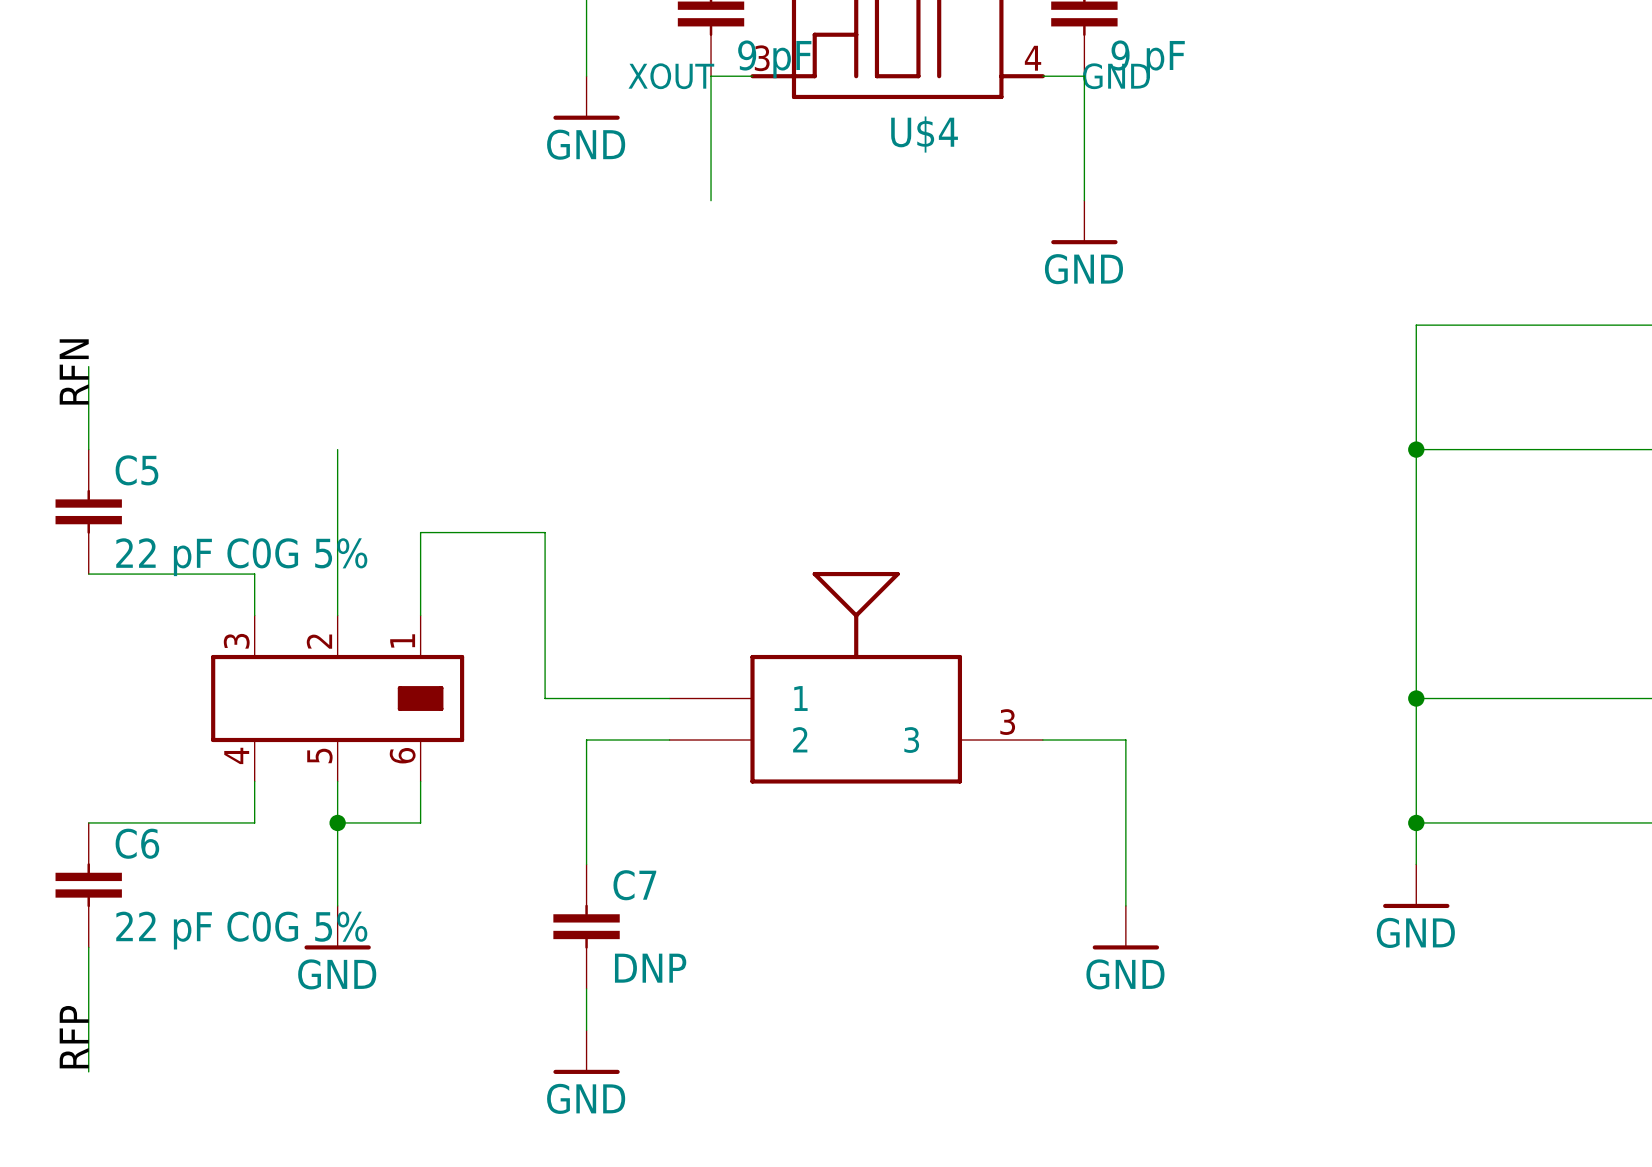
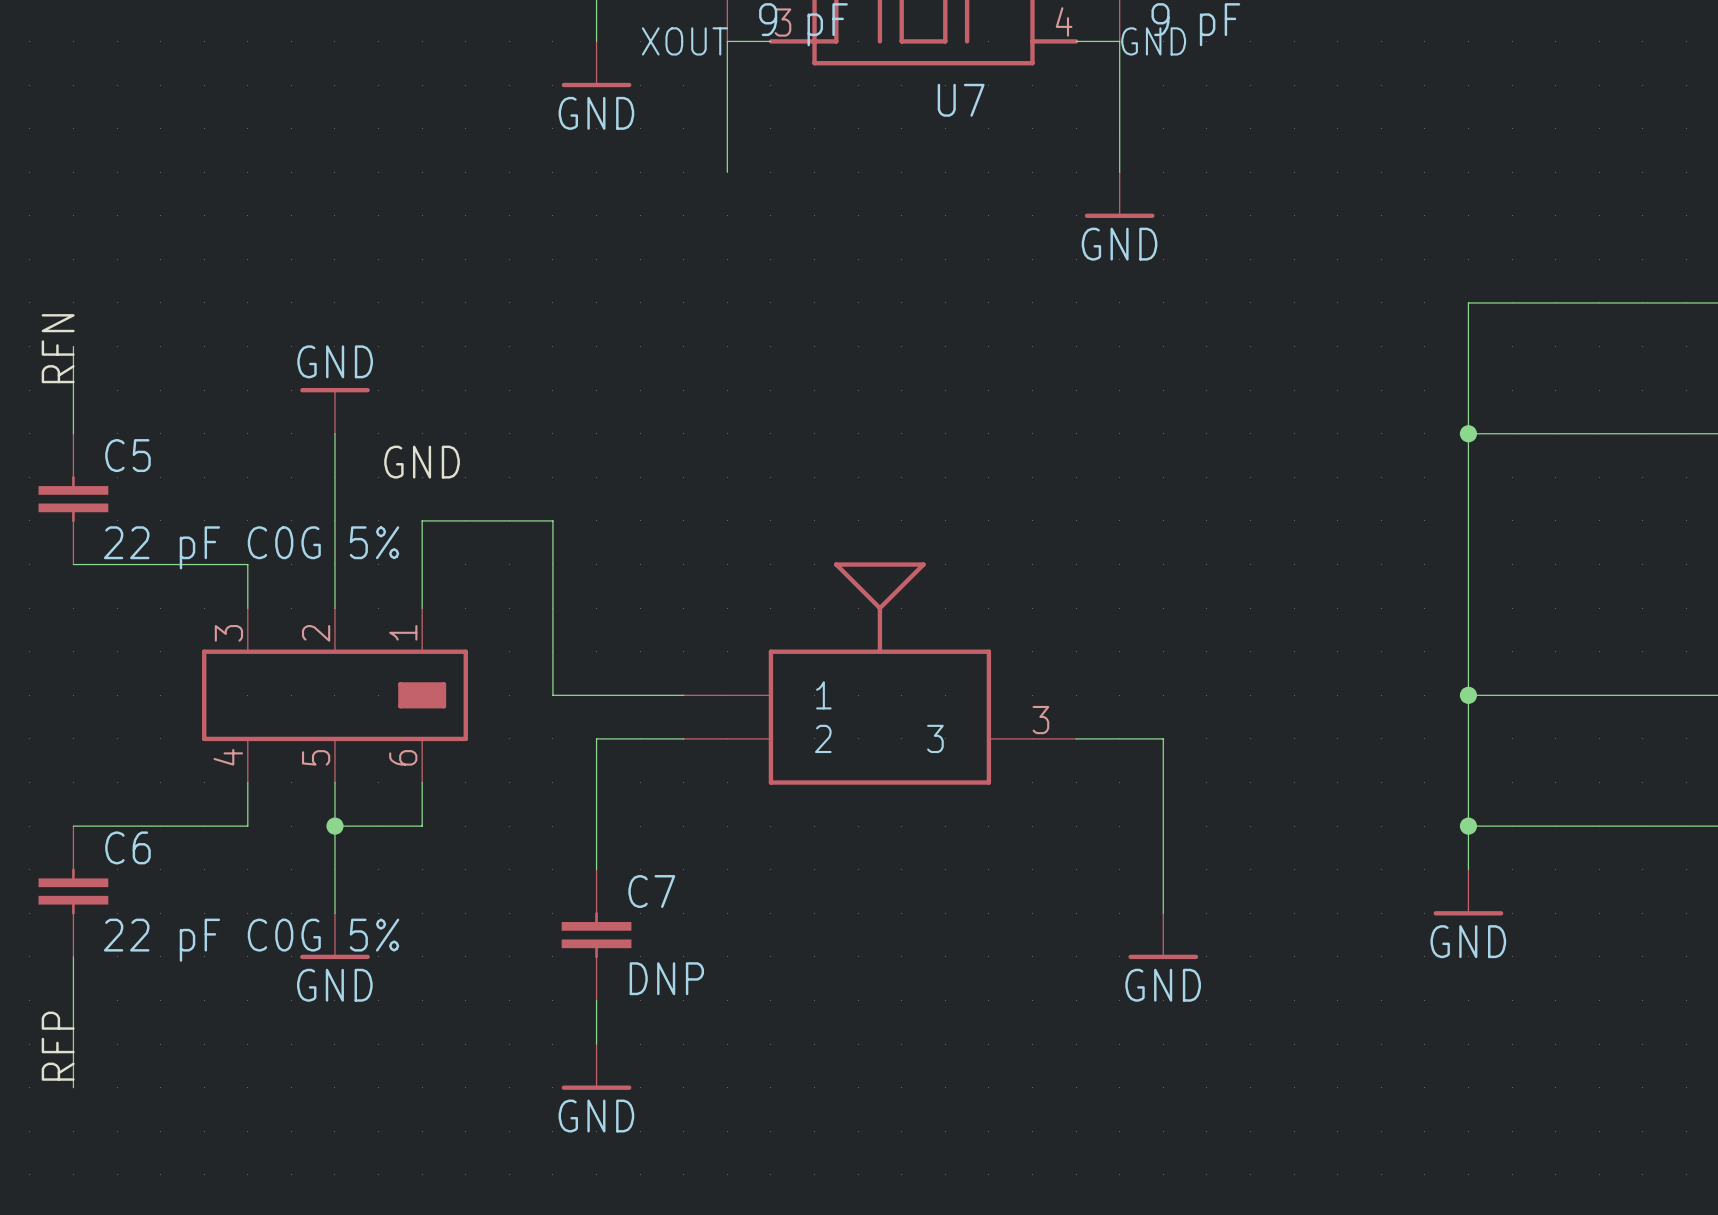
U$4 name: U$4 (924, 134) -> U7 (961, 100)
power symbol: none -> GND (334, 410)
label: none -> GND (422, 462)

